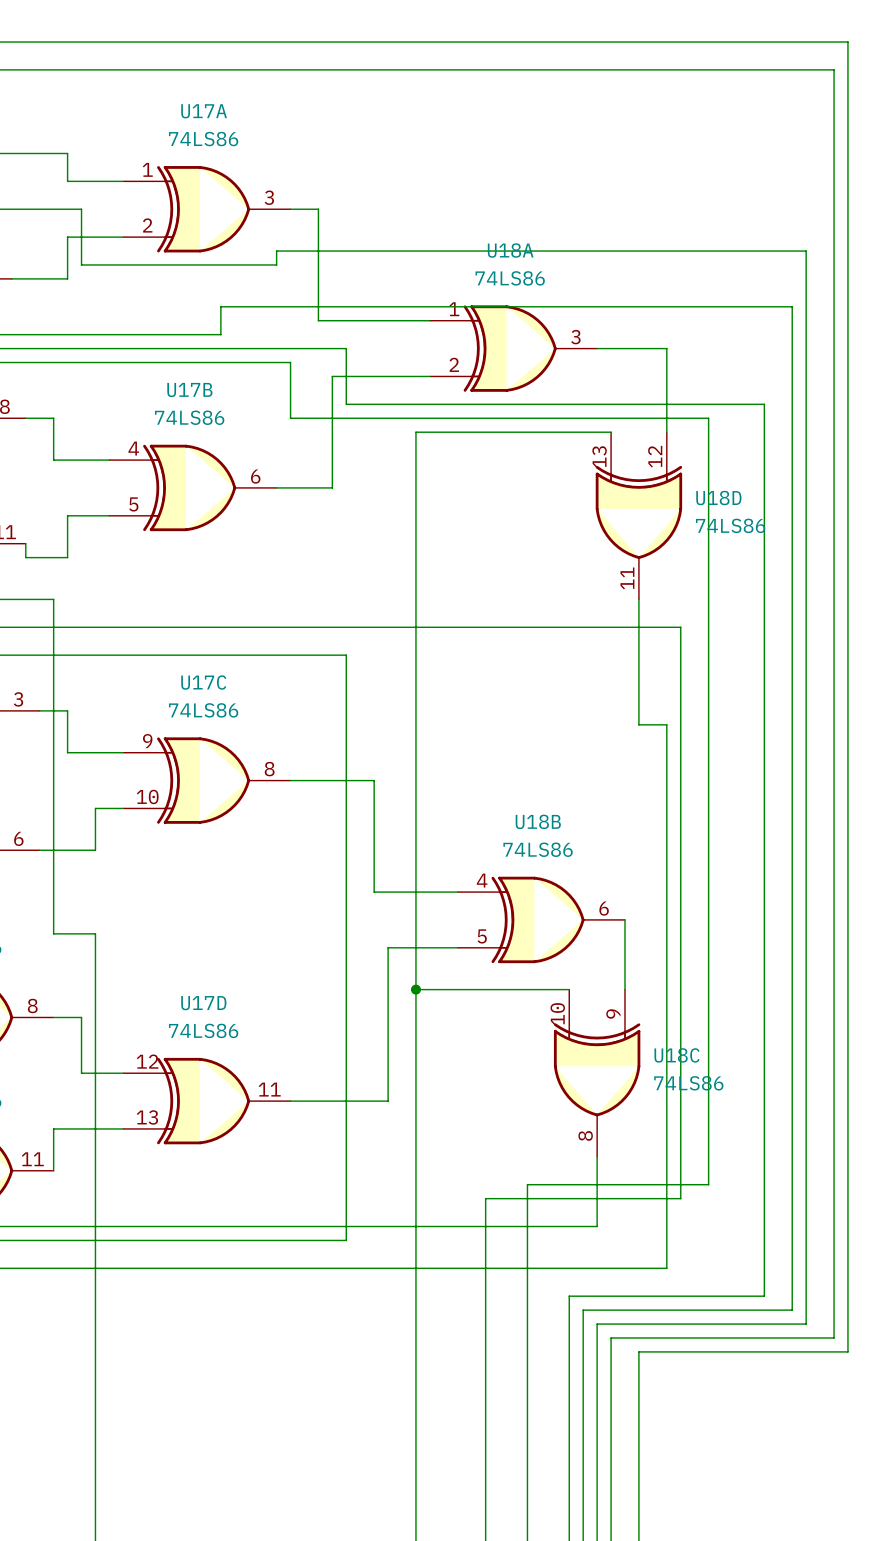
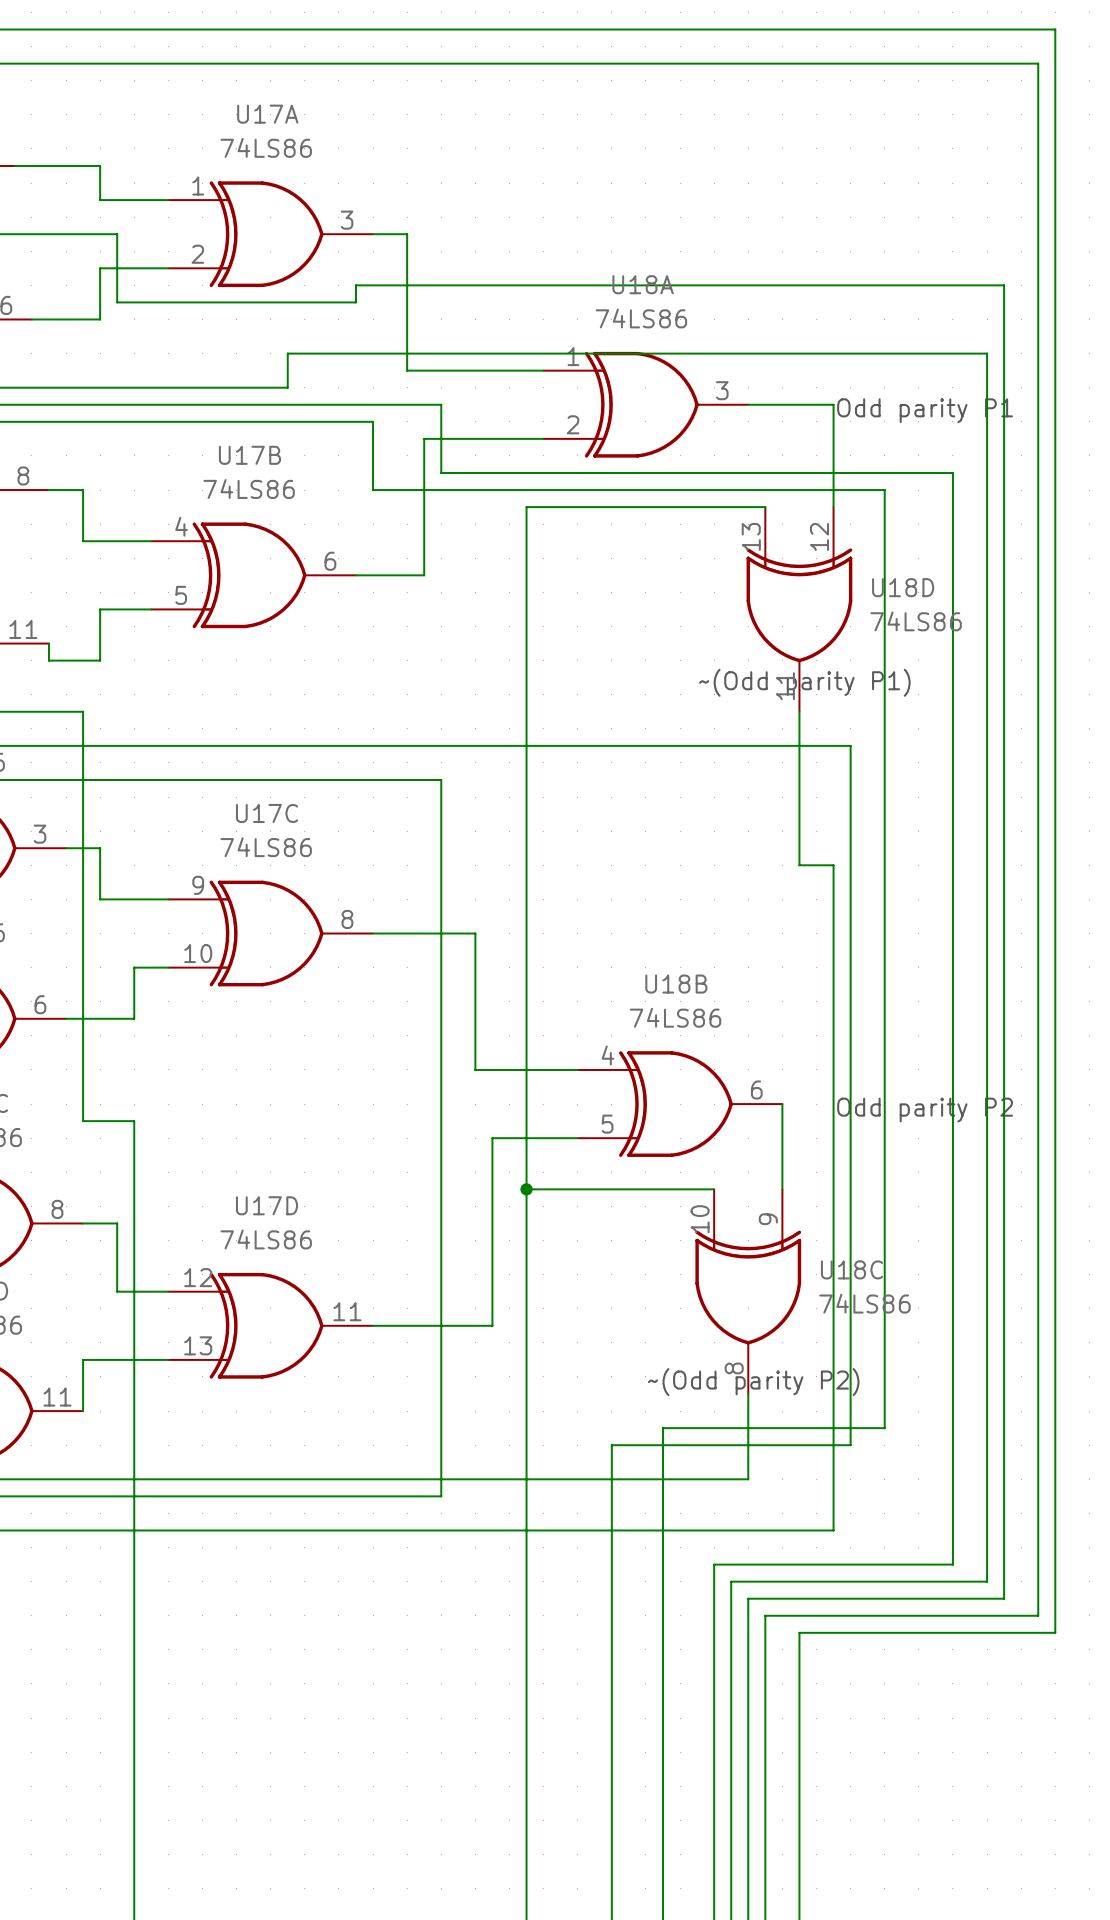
text: none -> Odd parity P1 (925, 410)
text: none -> ~(Odd parity P1) (804, 682)
text: none -> Odd parity P2 (925, 1110)
text: none -> ~(Odd parity P2) (753, 1382)

